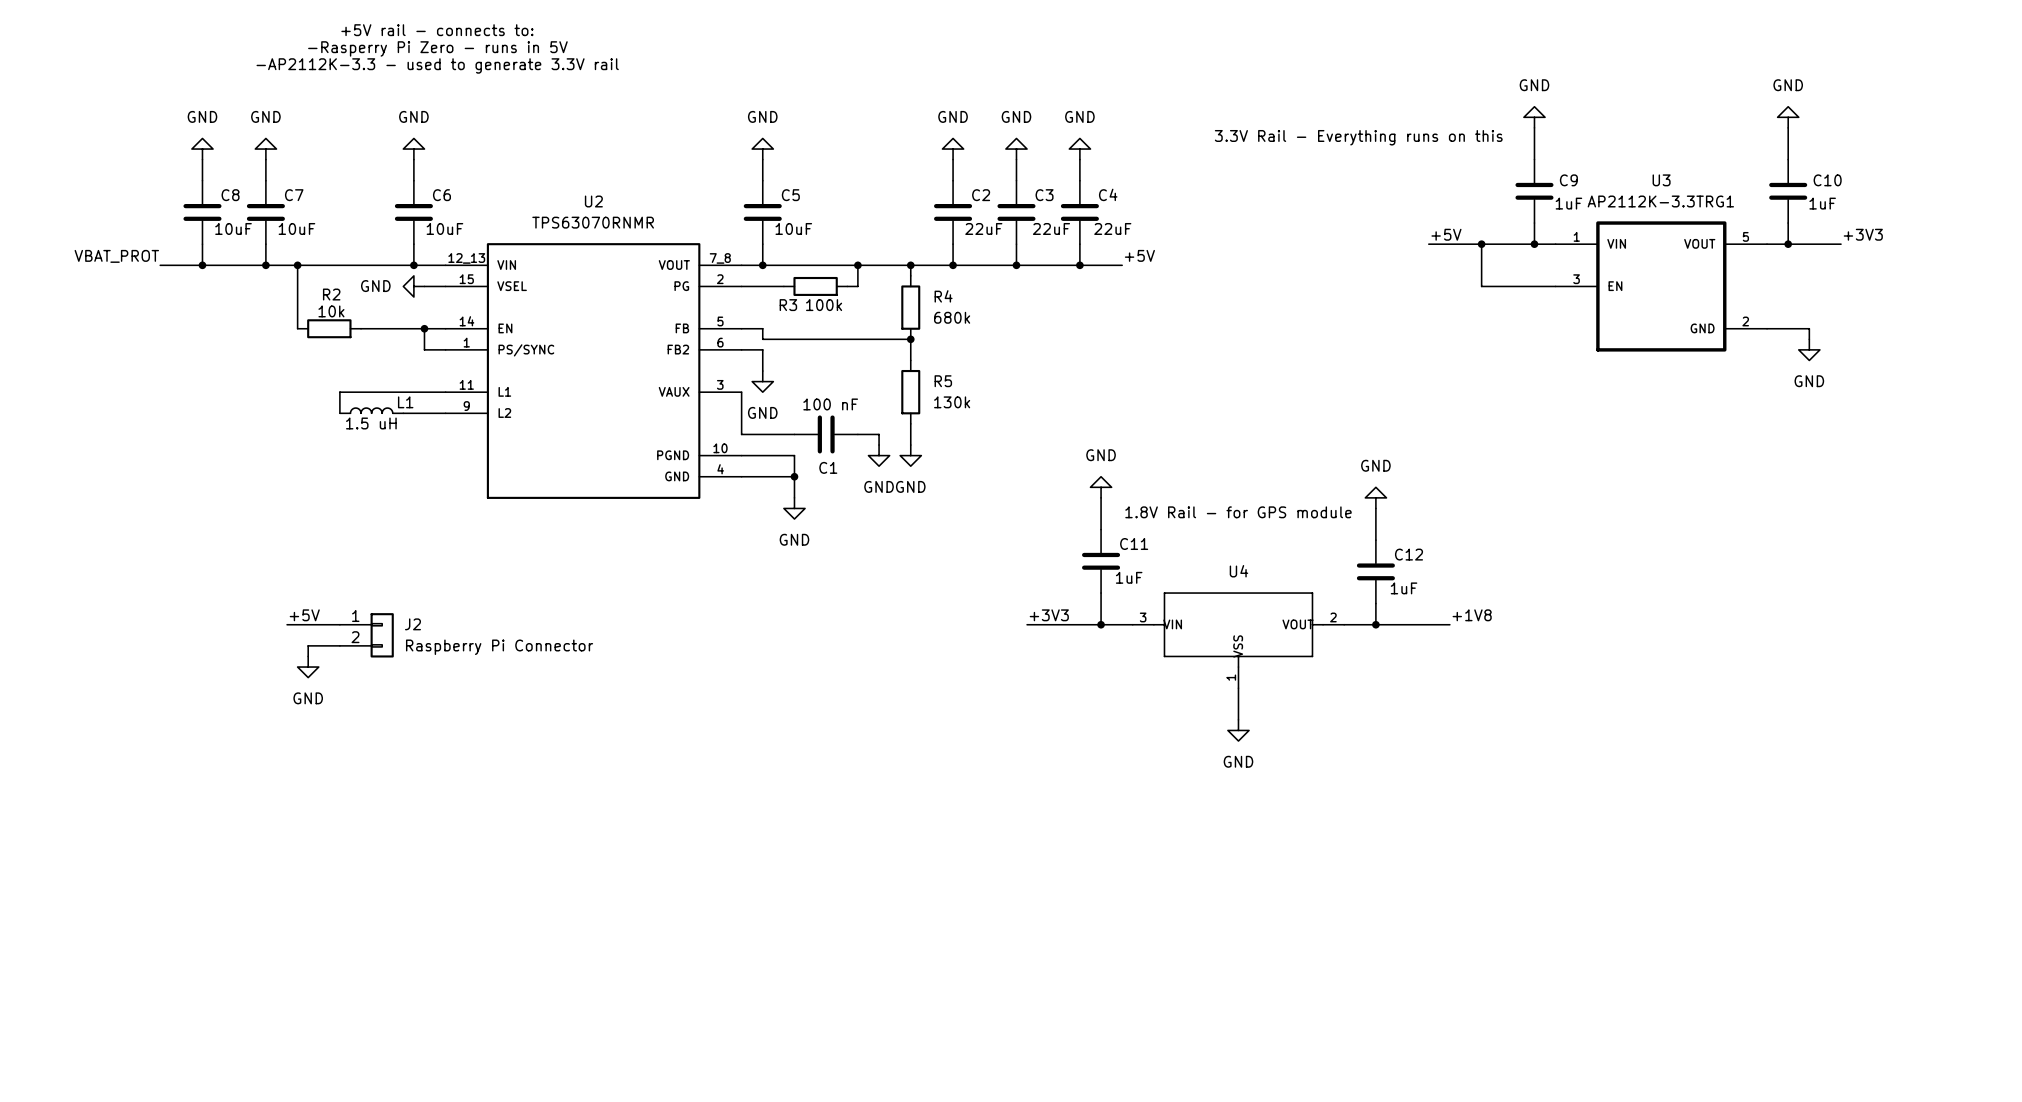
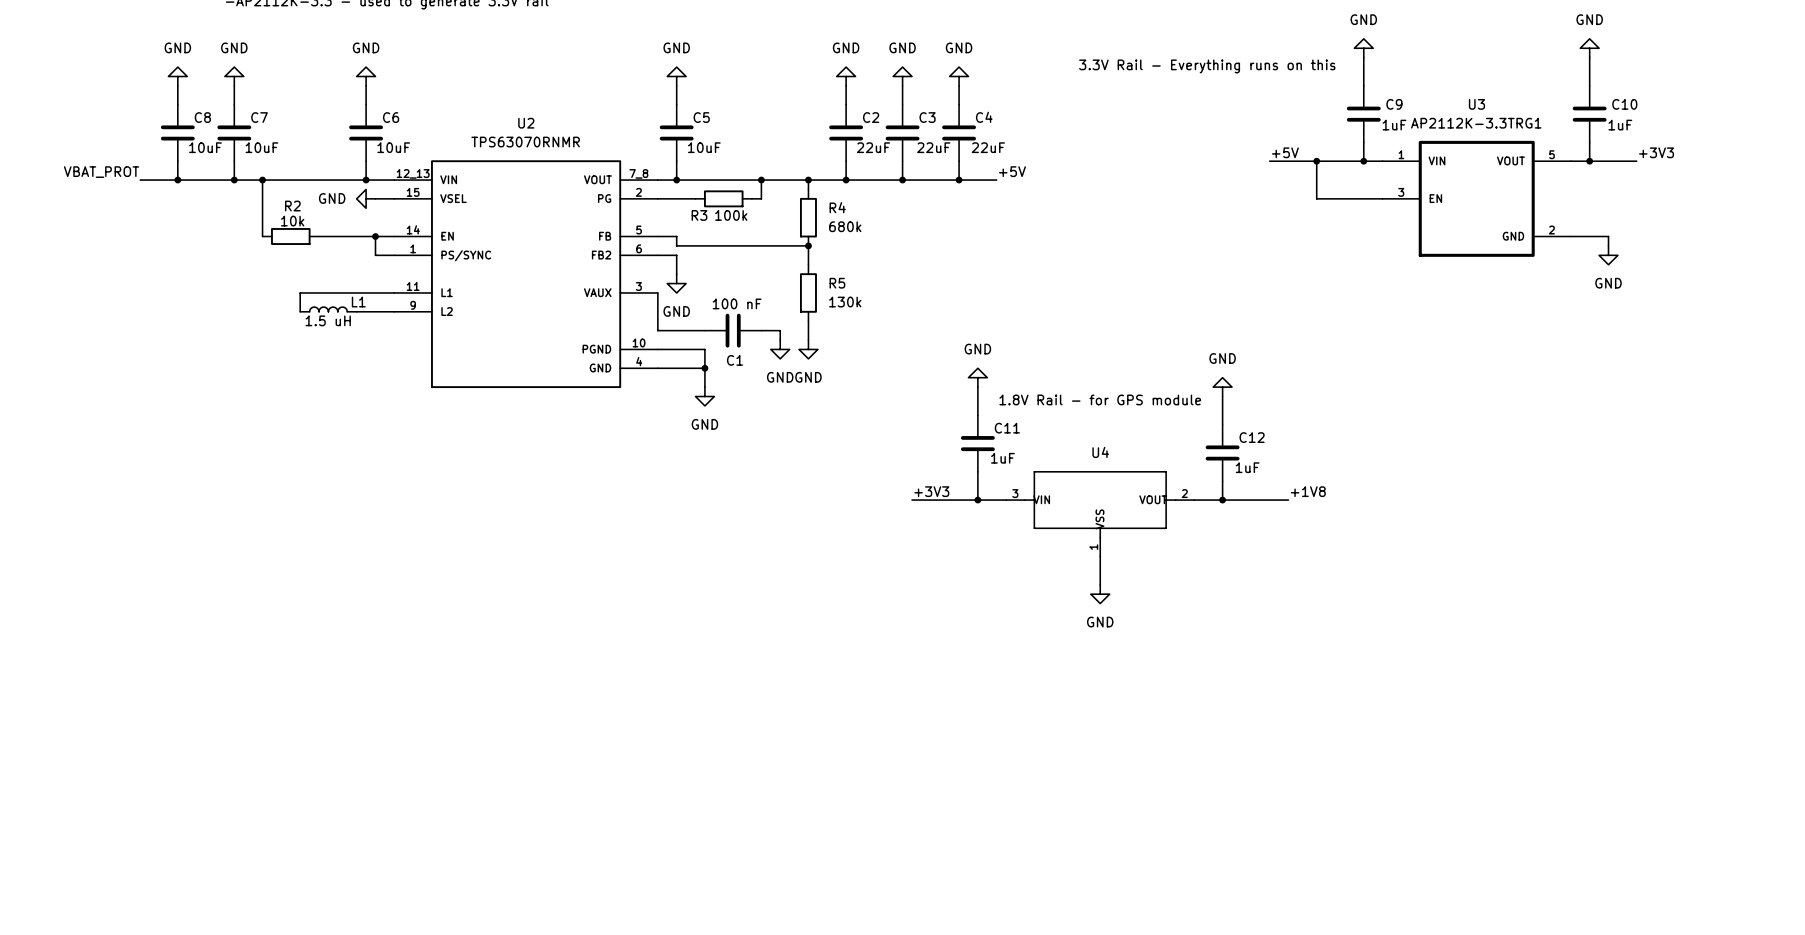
label: +5V (304, 615) -> none
wire: (287, 624) (339, 624) -> none
J2: Raspberry Pi Connector (366, 635) -> none
wire: (339, 645) (308, 645) (308, 656) -> none
power symbol: GND (308, 667) -> none

